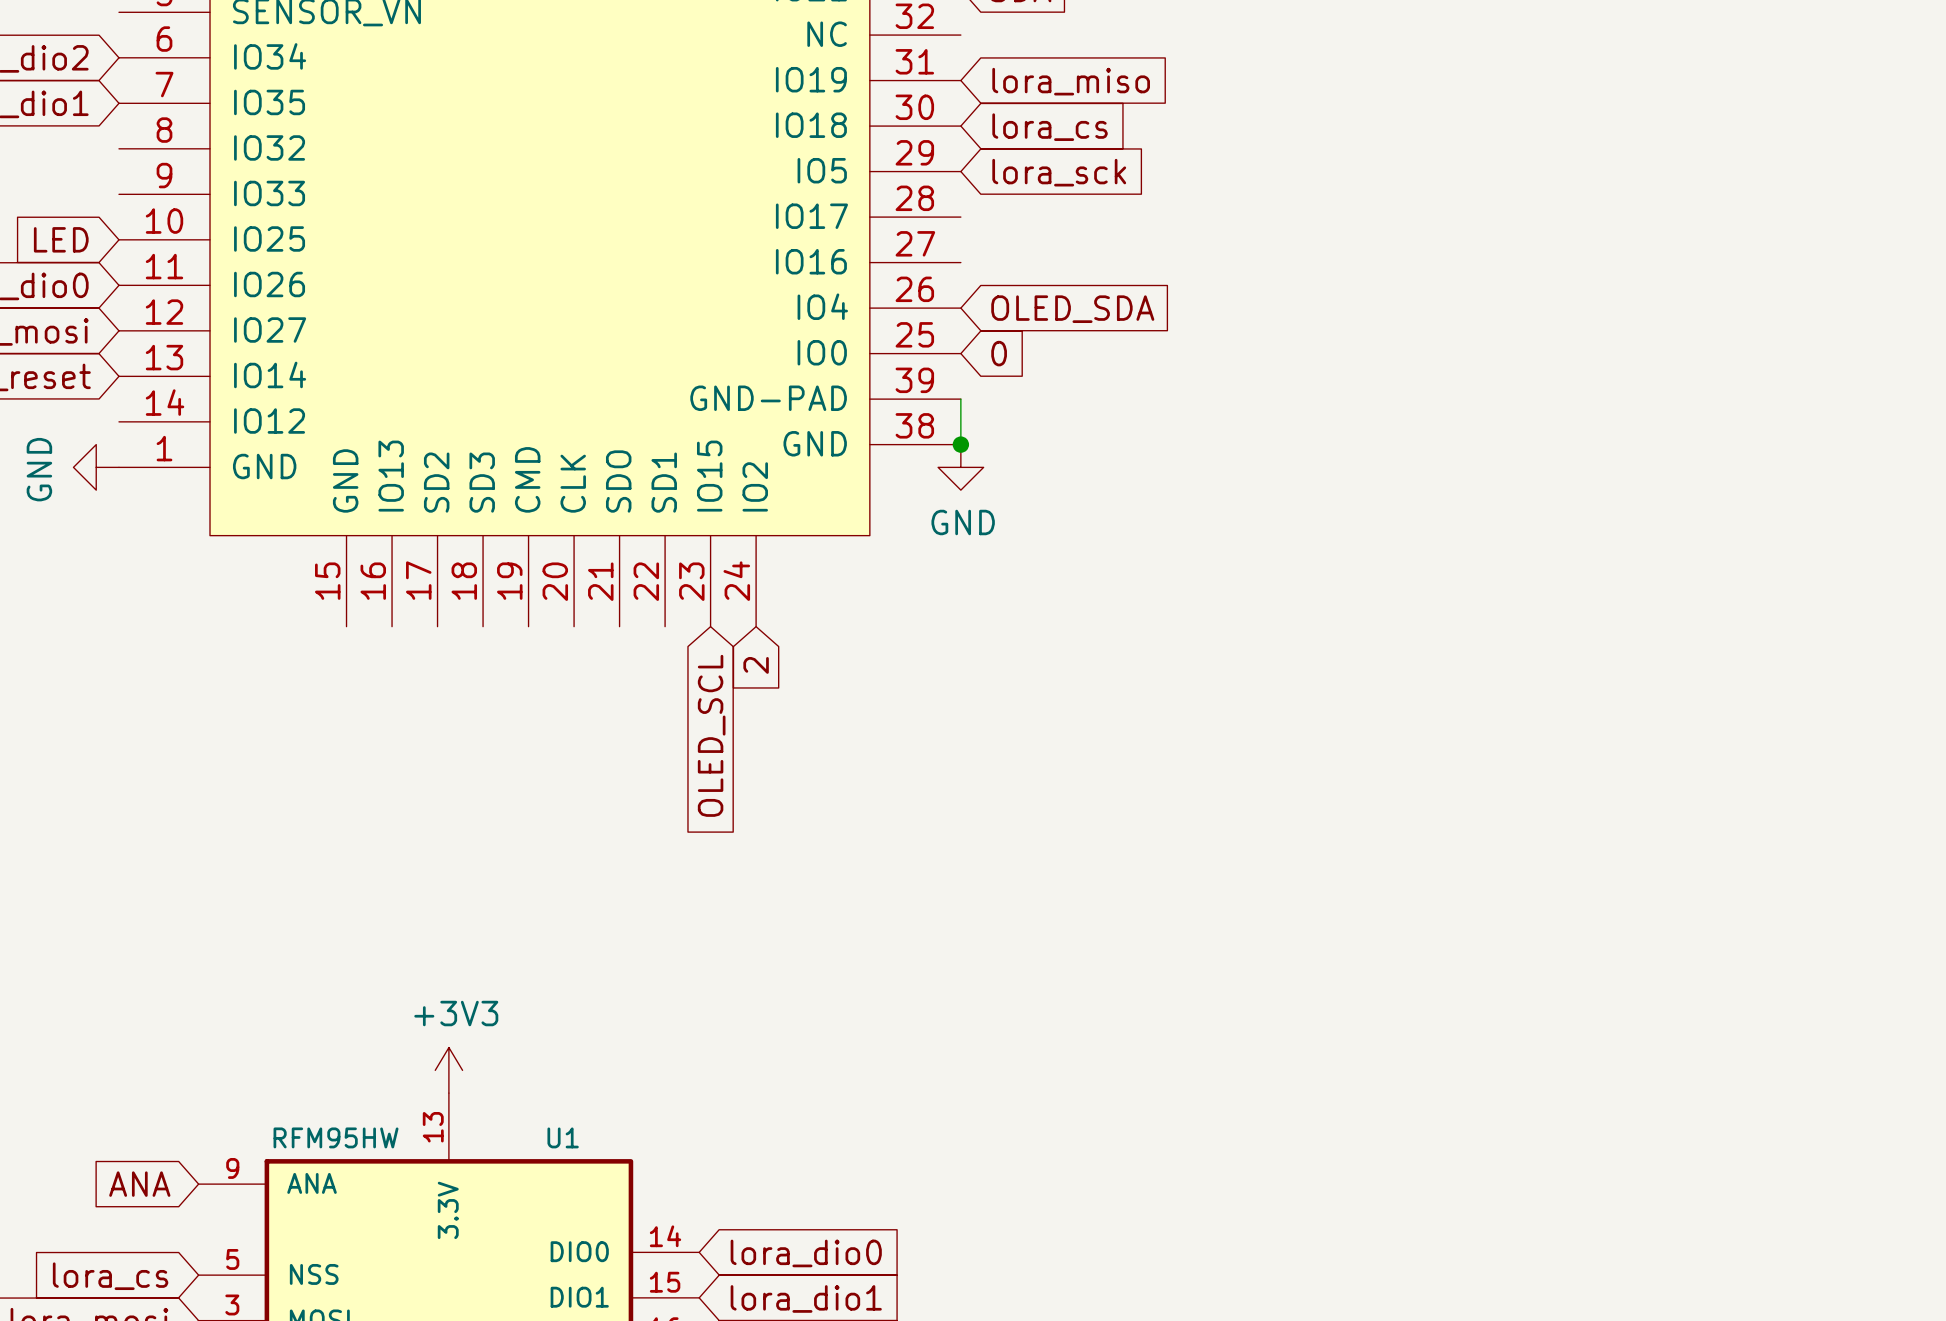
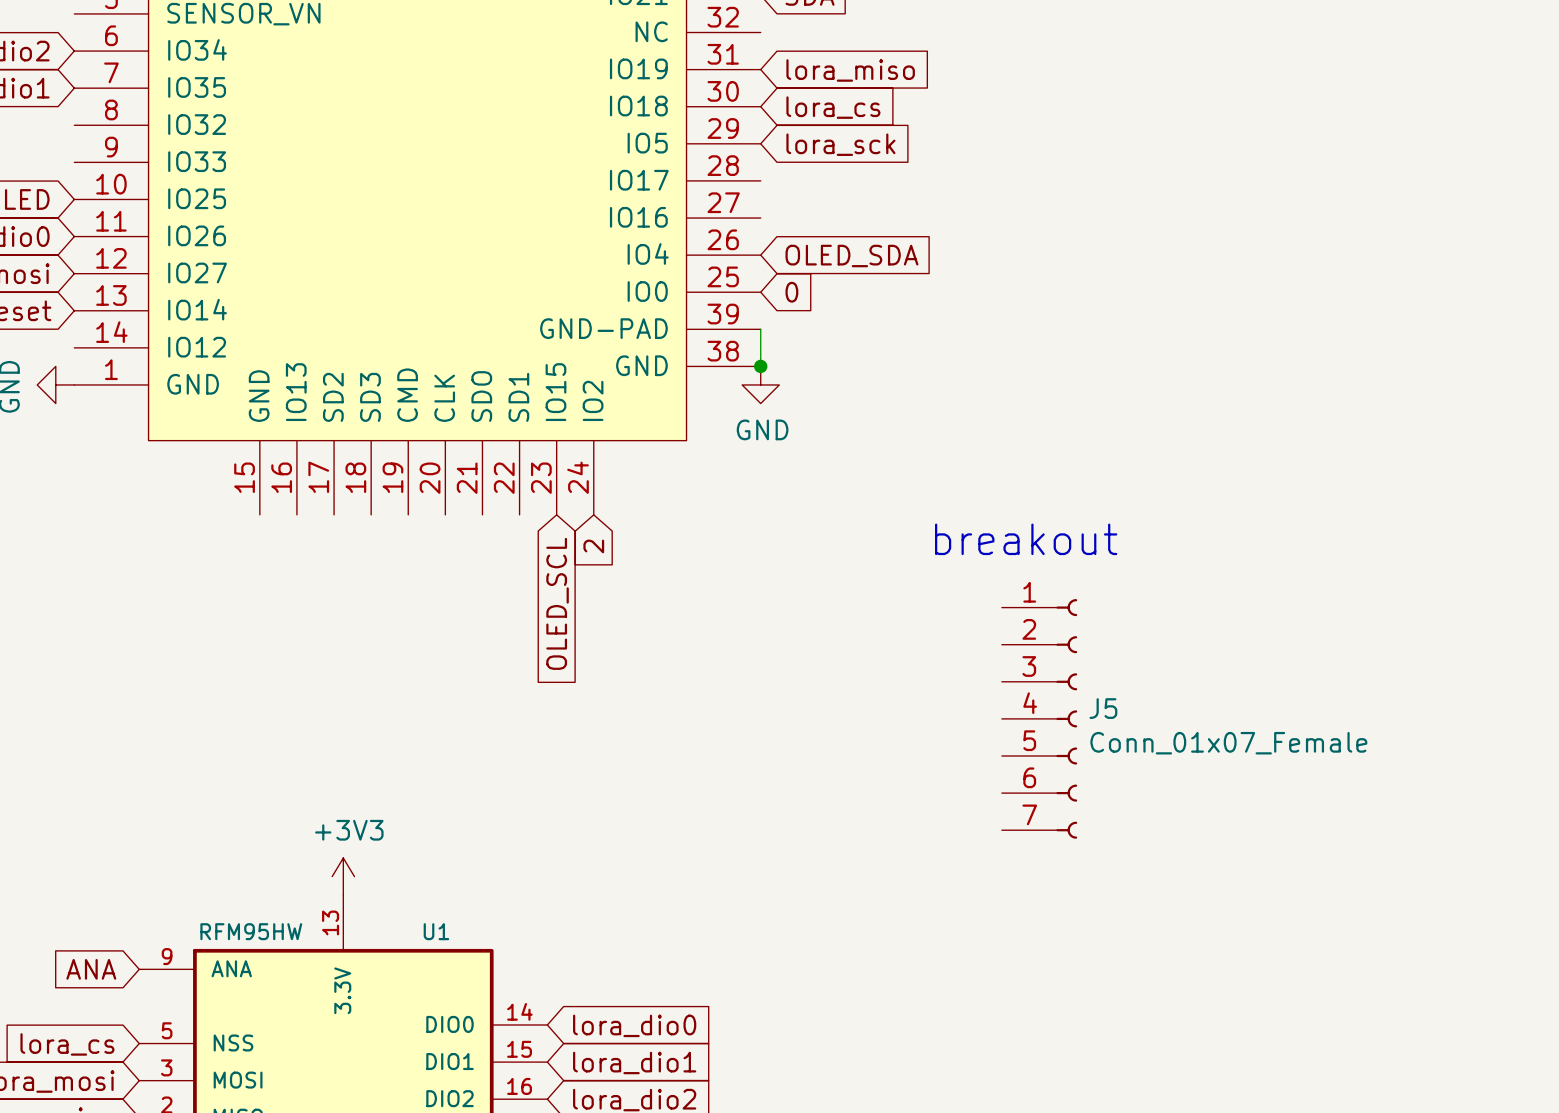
text: none -> breakout (1026, 539)
J5: none -> Conn_01x07_Female (1039, 718)

